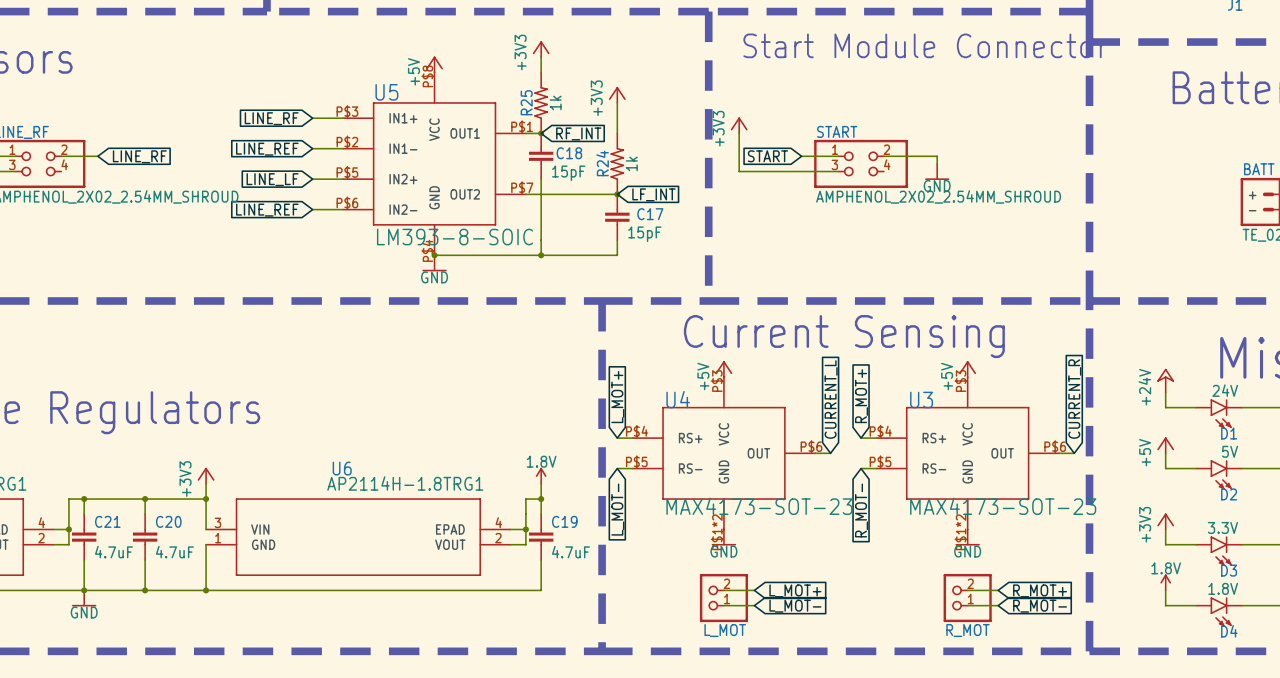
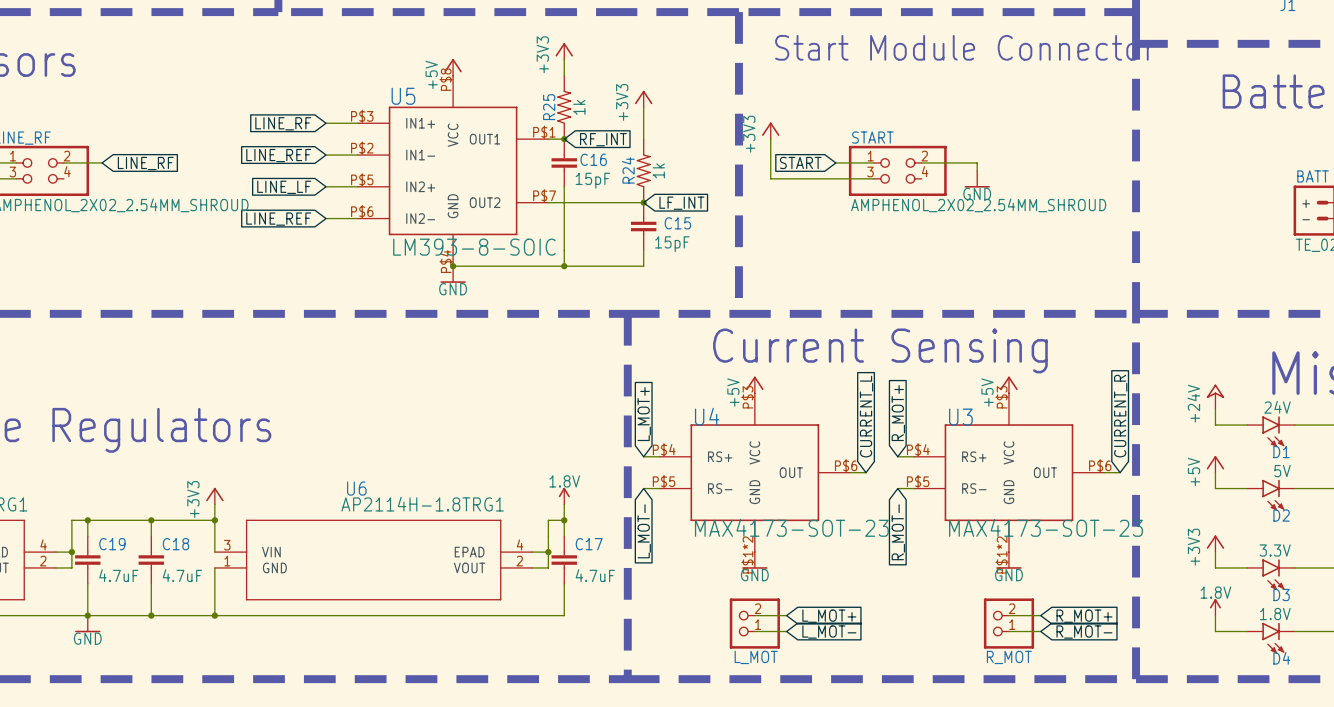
C18 name: C18 (569, 153) -> C16 (593, 159)
C17 name: C17 (650, 214) -> C15 (677, 223)
C21 name: C21 (107, 521) -> C19 (112, 544)
C20 name: C20 (168, 521) -> C18 (175, 544)
C19 name: C19 (564, 521) -> C17 (589, 544)

